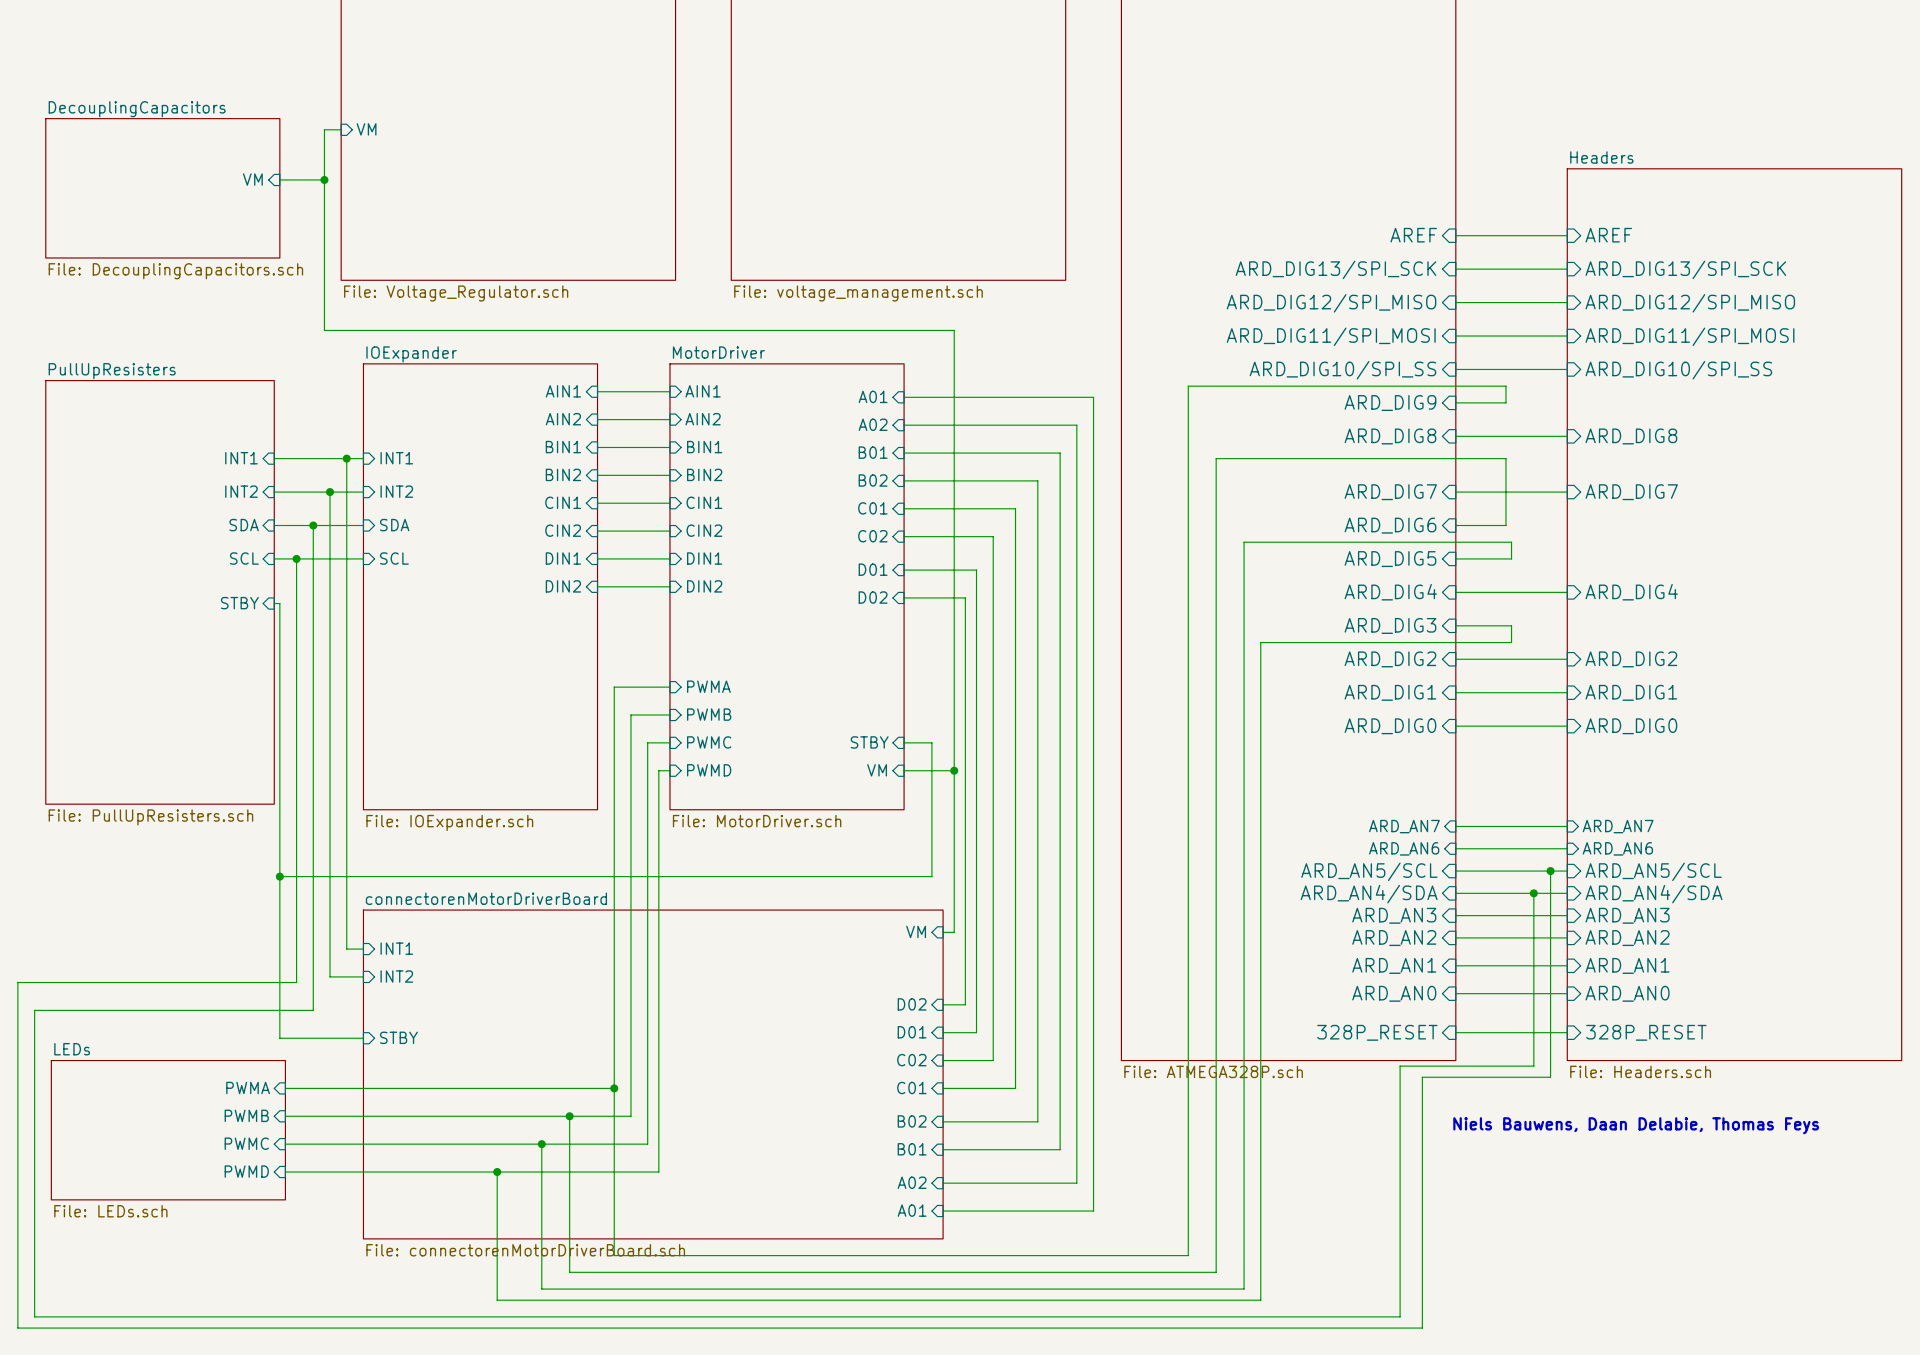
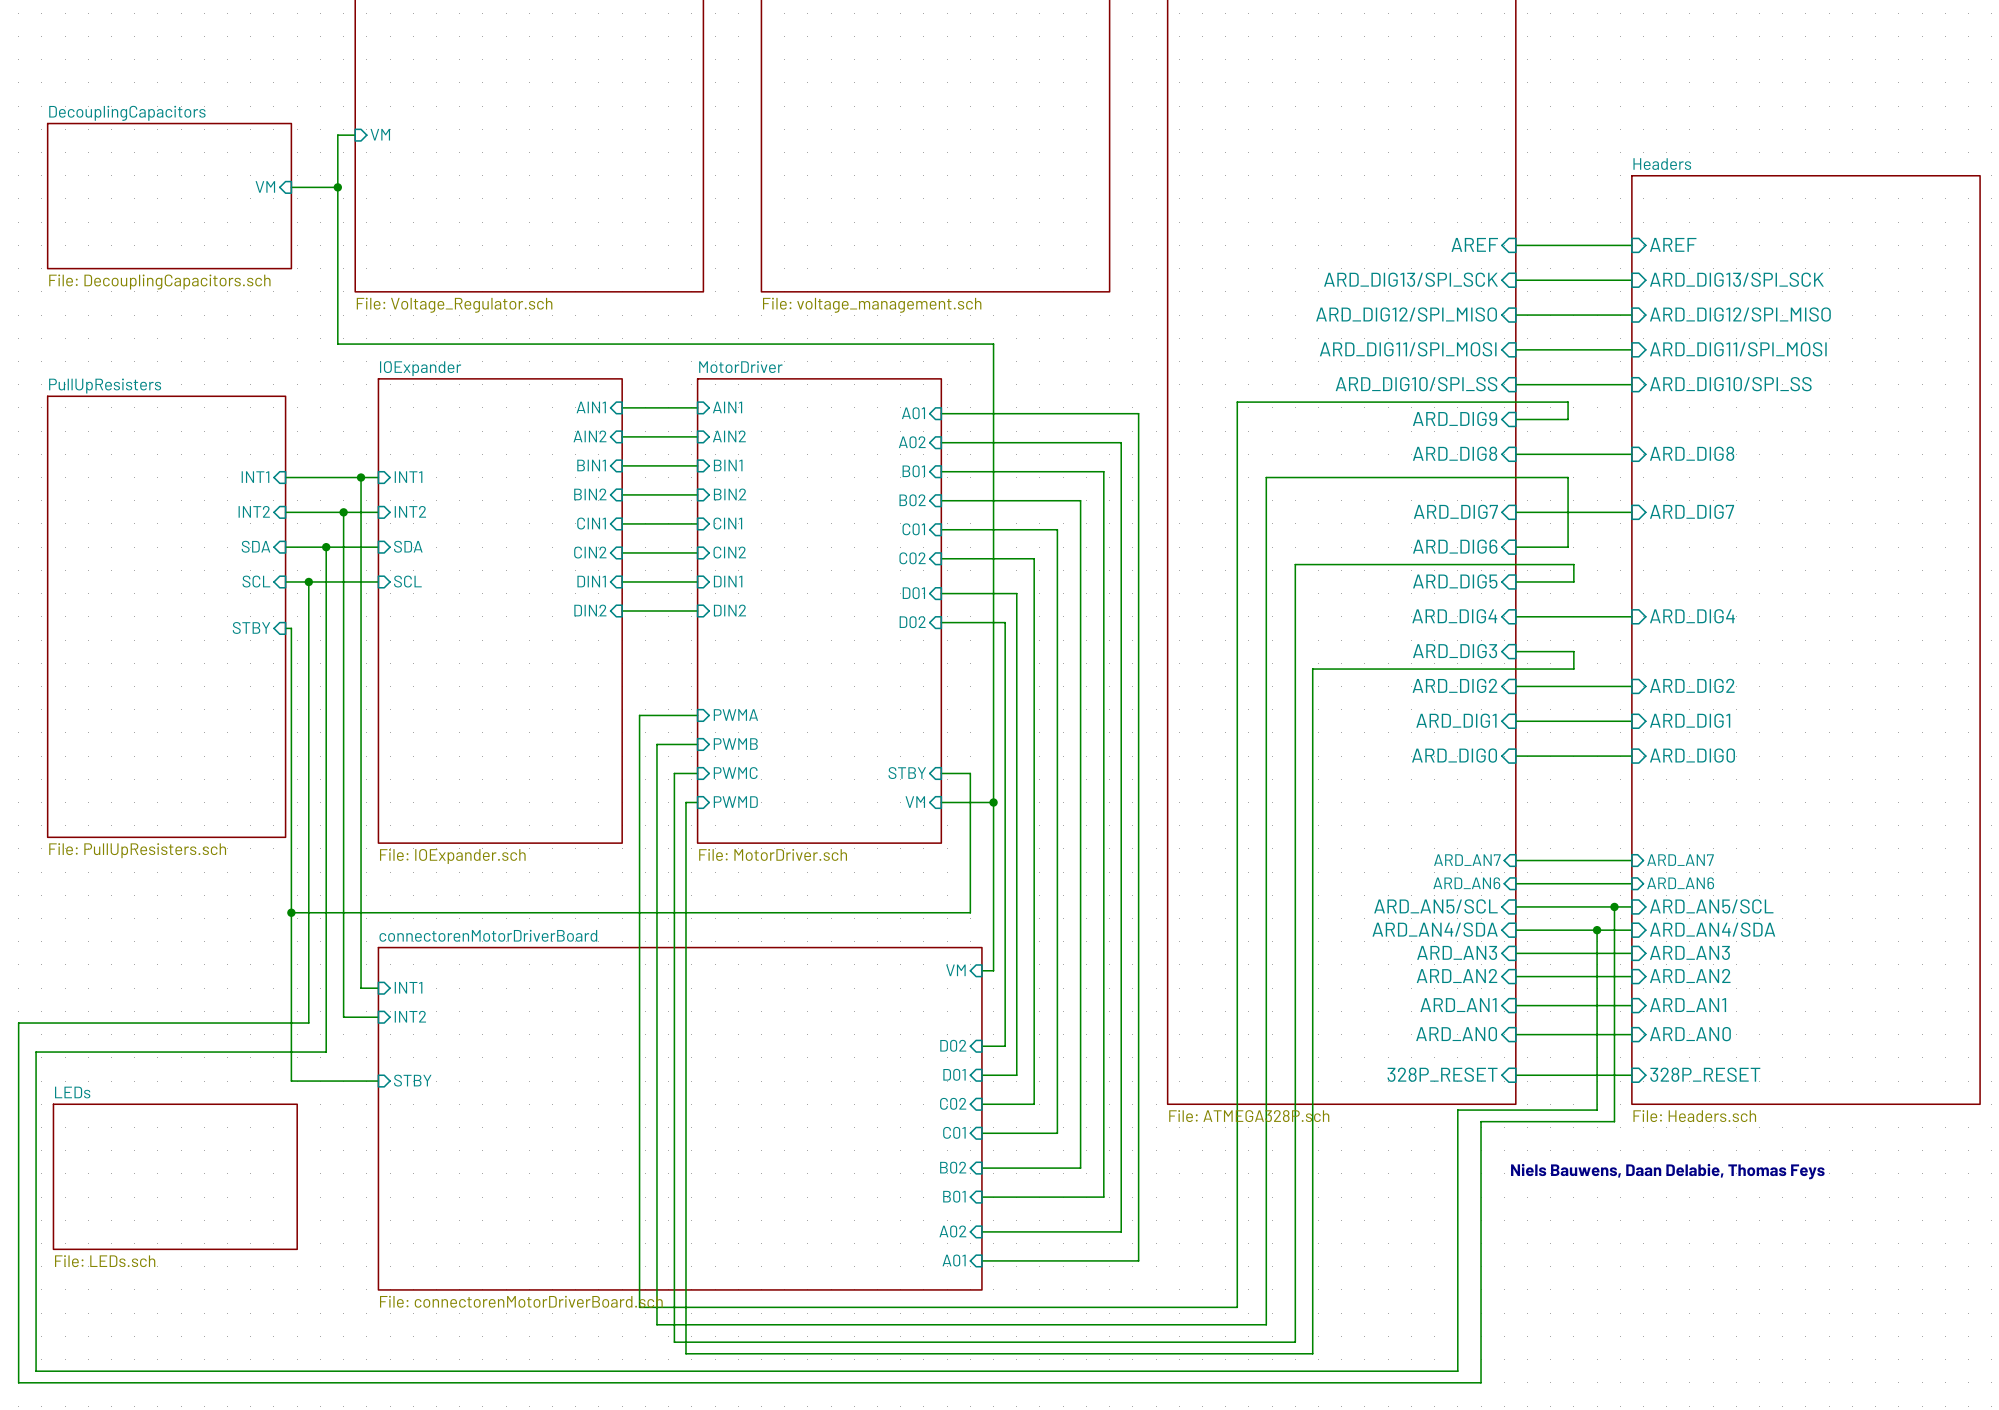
sheet pin: PWMA (248, 1087) -> none
wire: (285, 1088) (614, 1088) -> none
junction: (614, 1088) -> none
sheet pin: PWMB (246, 1115) -> none
wire: (285, 1116) (630, 1116) -> none
wire: (569, 1116) (569, 1272) (630, 1272) -> (656, 1162) (656, 1324)
junction: (569, 1116) -> none
sheet pin: PWMC (246, 1143) -> none
wire: (285, 1144) (647, 1144) -> none
wire: (541, 1144) (541, 1289) (647, 1289) -> (674, 1191) (674, 1342)
junction: (541, 1144) -> none
sheet pin: PWMD (246, 1171) -> none
wire: (285, 1172) (658, 1172) -> none
wire: (497, 1172) (497, 1300) (658, 1300) -> (685, 1220) (685, 1353)
junction: (497, 1172) -> none

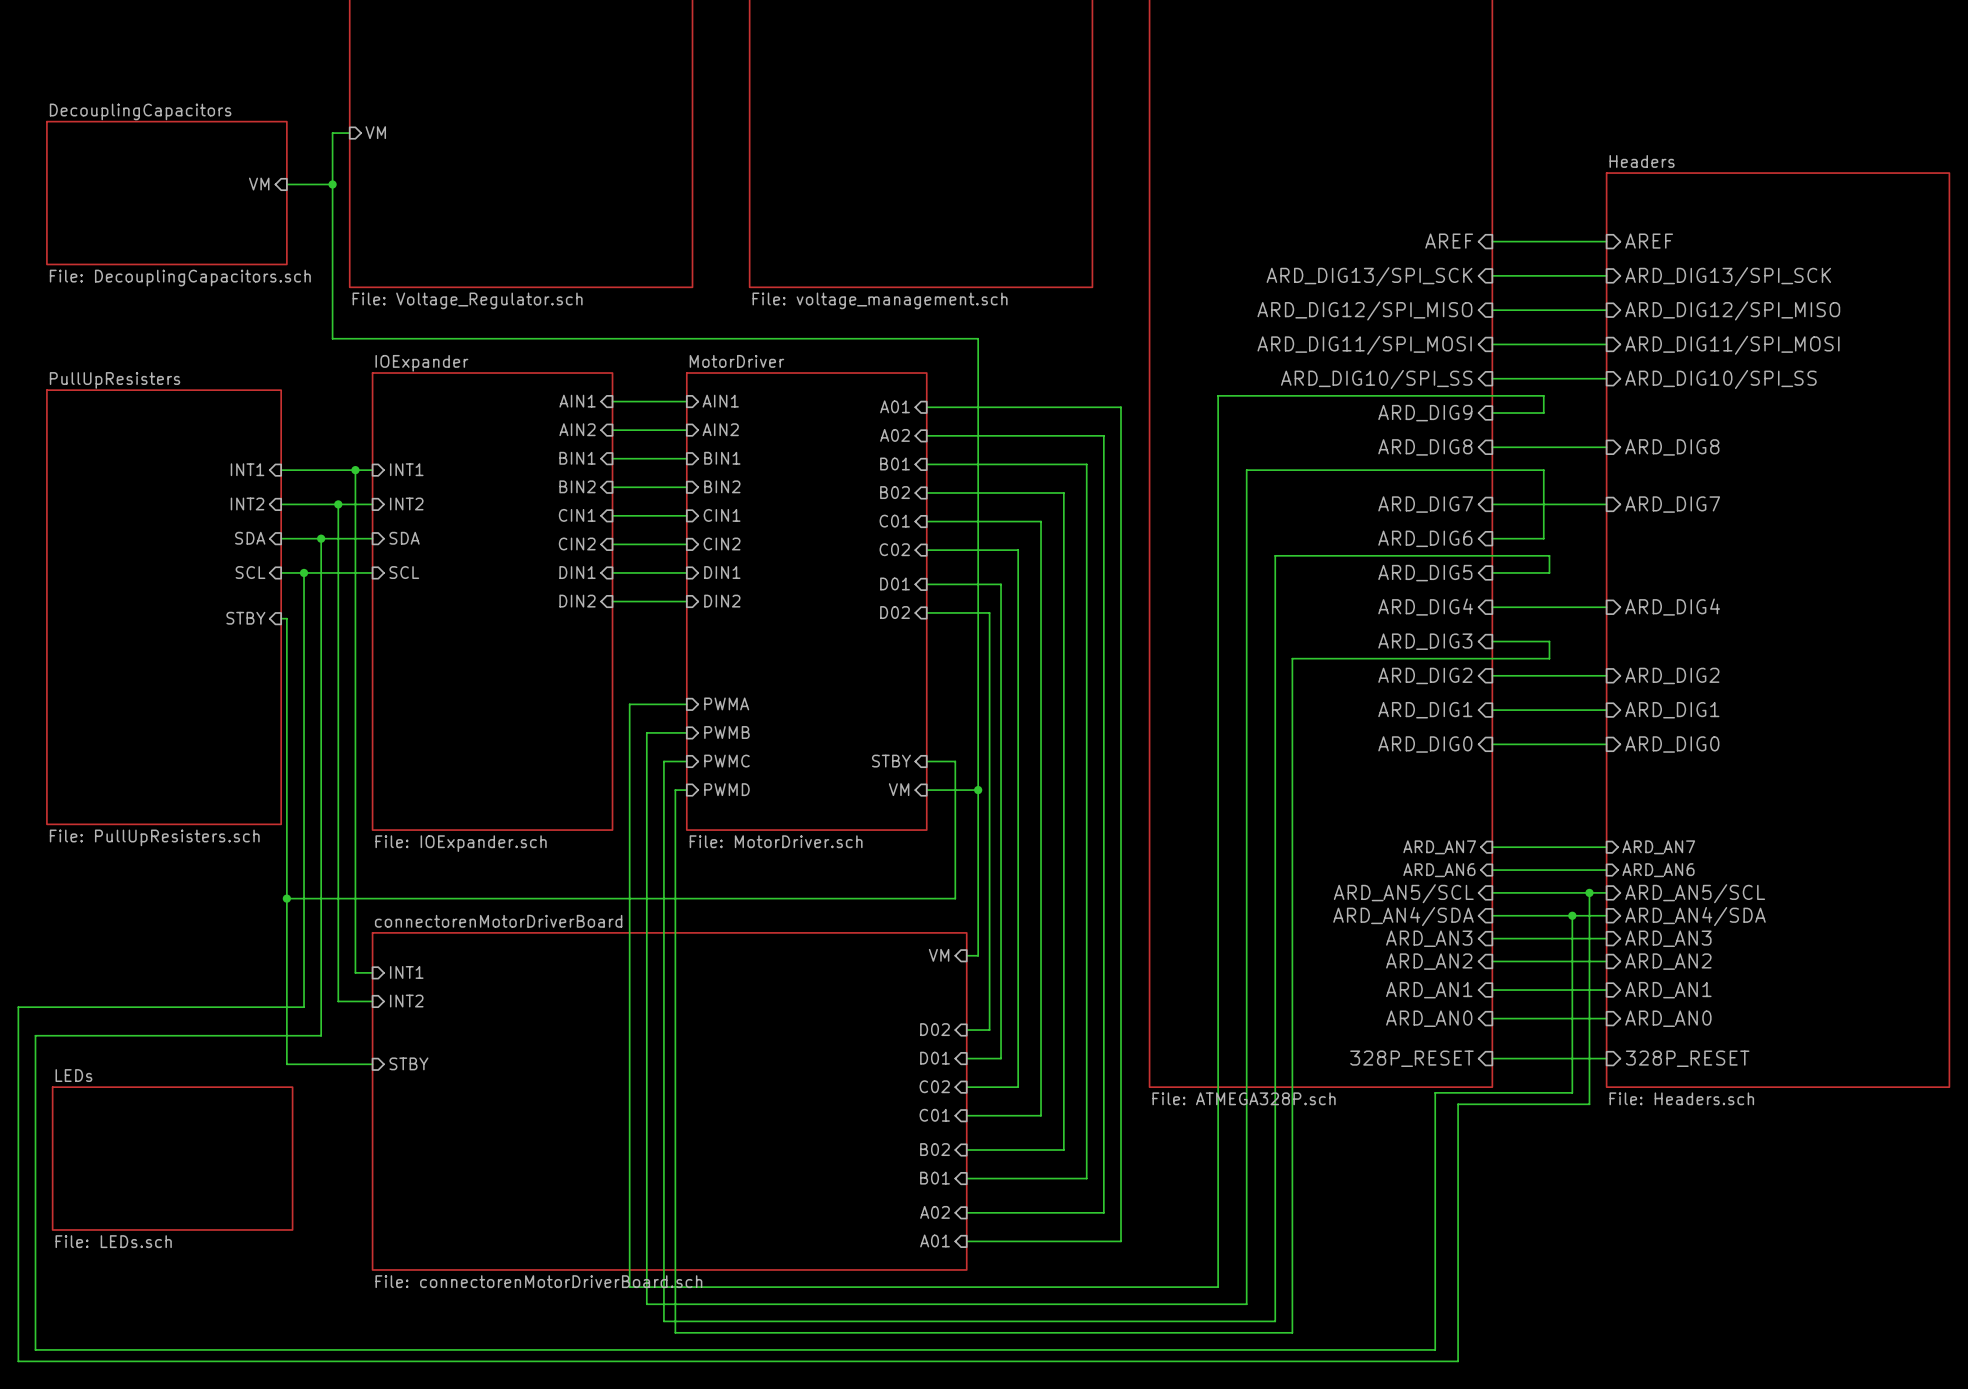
text: Niels Bauwens, Daan Delabie, Thomas Feys (1667, 1171) -> none

